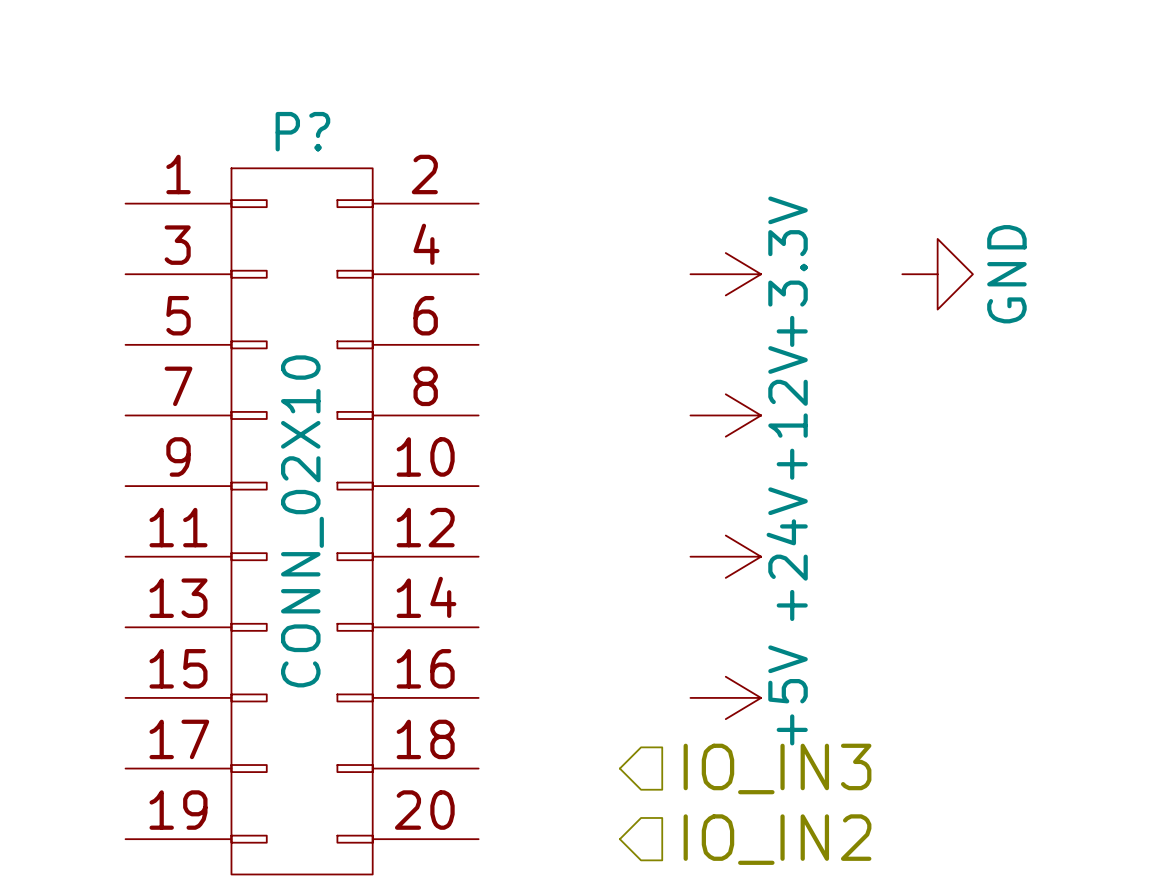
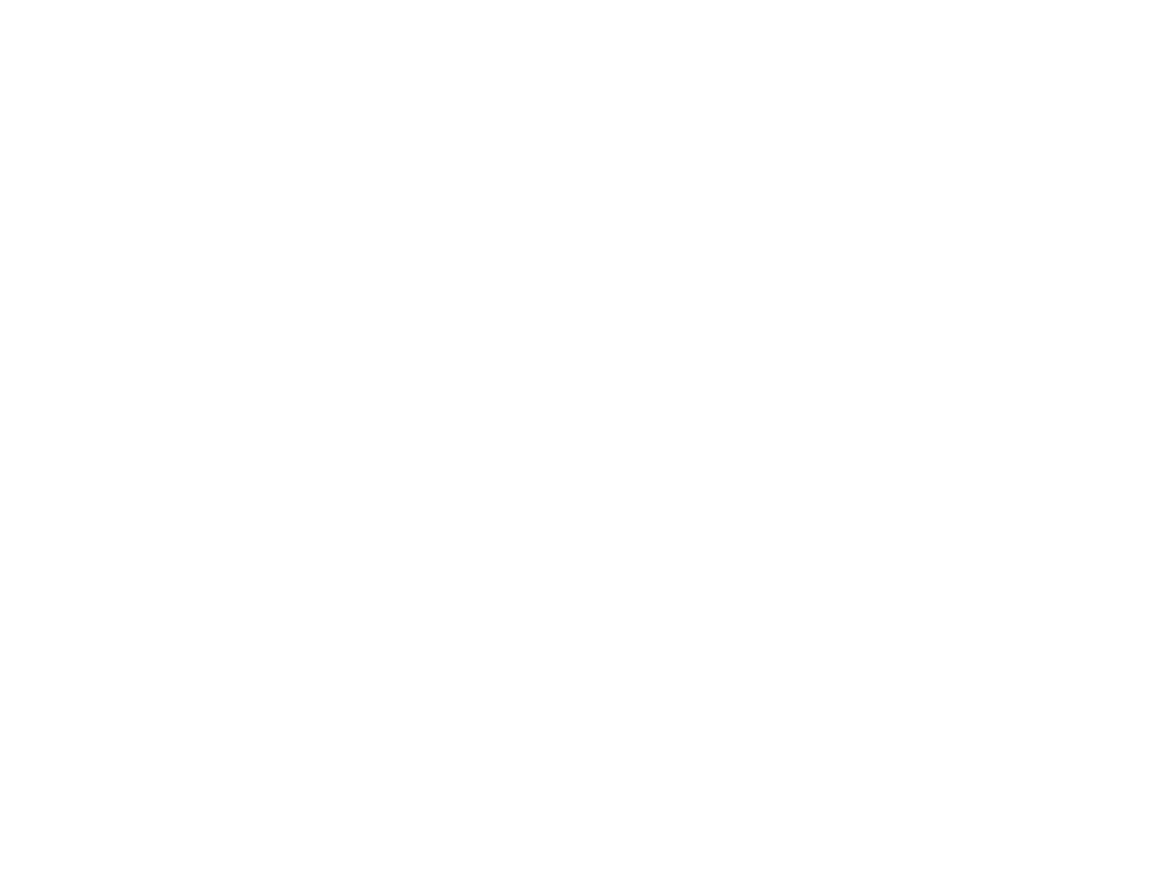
power symbol: +3.3V (725, 274) -> none
power symbol: GND (937, 274) -> none
power symbol: +12V (725, 415) -> none
P?: CONN_02X10 (302, 521) -> none
power symbol: +24V (725, 556) -> none
power symbol: +5V (725, 697) -> none
hierarchical label: IO_IN3 (777, 768) -> none
hierarchical label: IO_IN2 (777, 839) -> none

